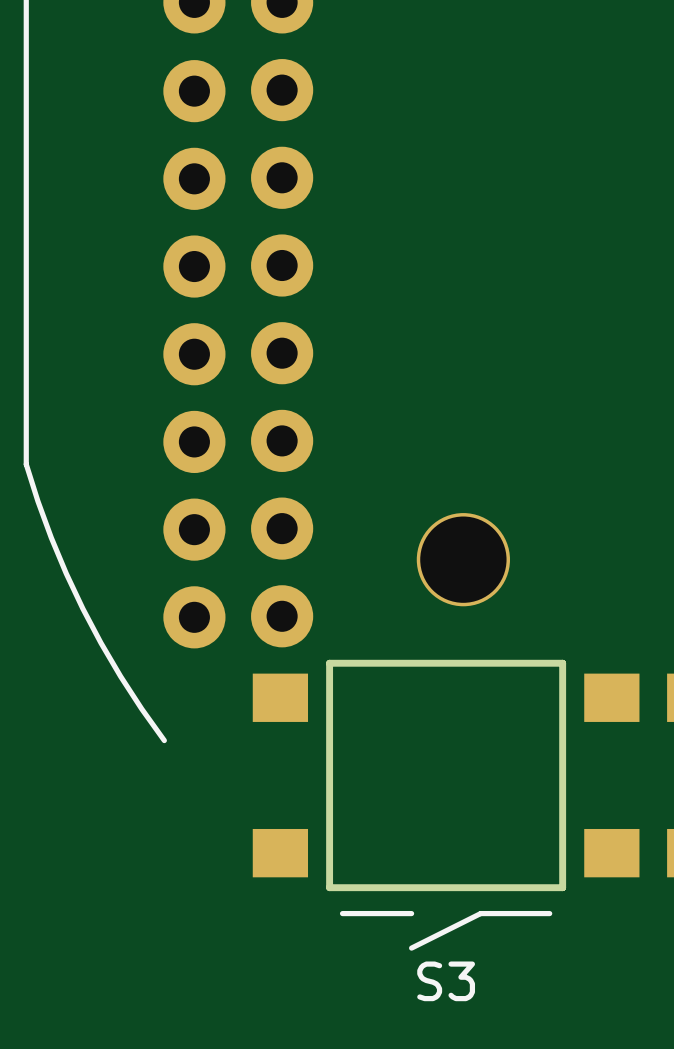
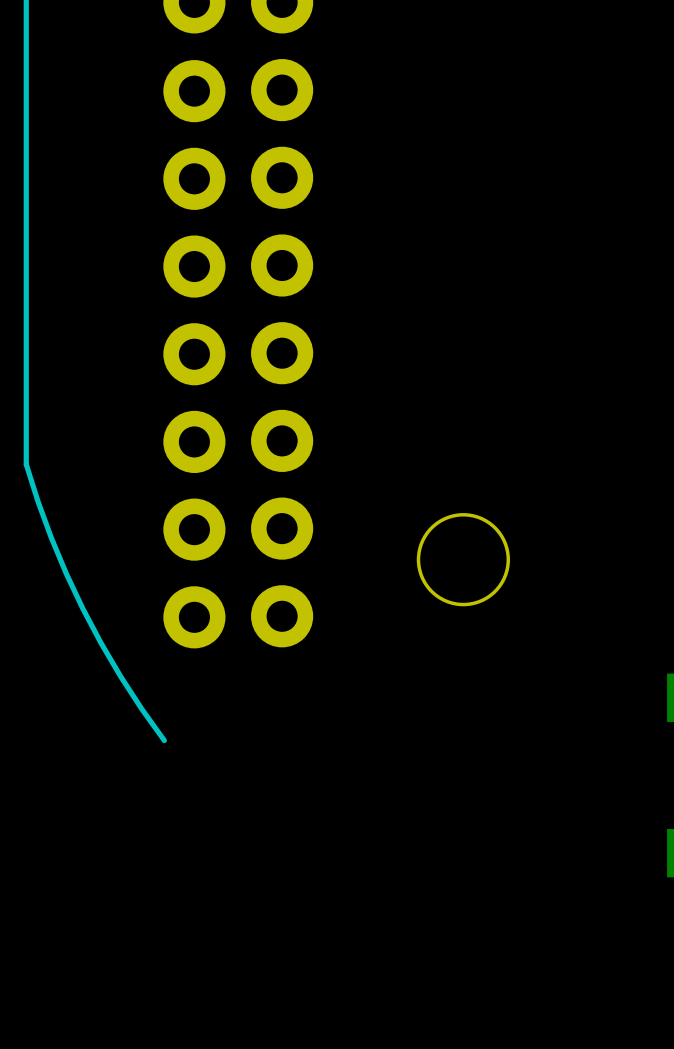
board edge: (562, 663) (329, 663) (329, 887) (562, 887) (562, 663) -> none
S3: (446, 812) -> none

